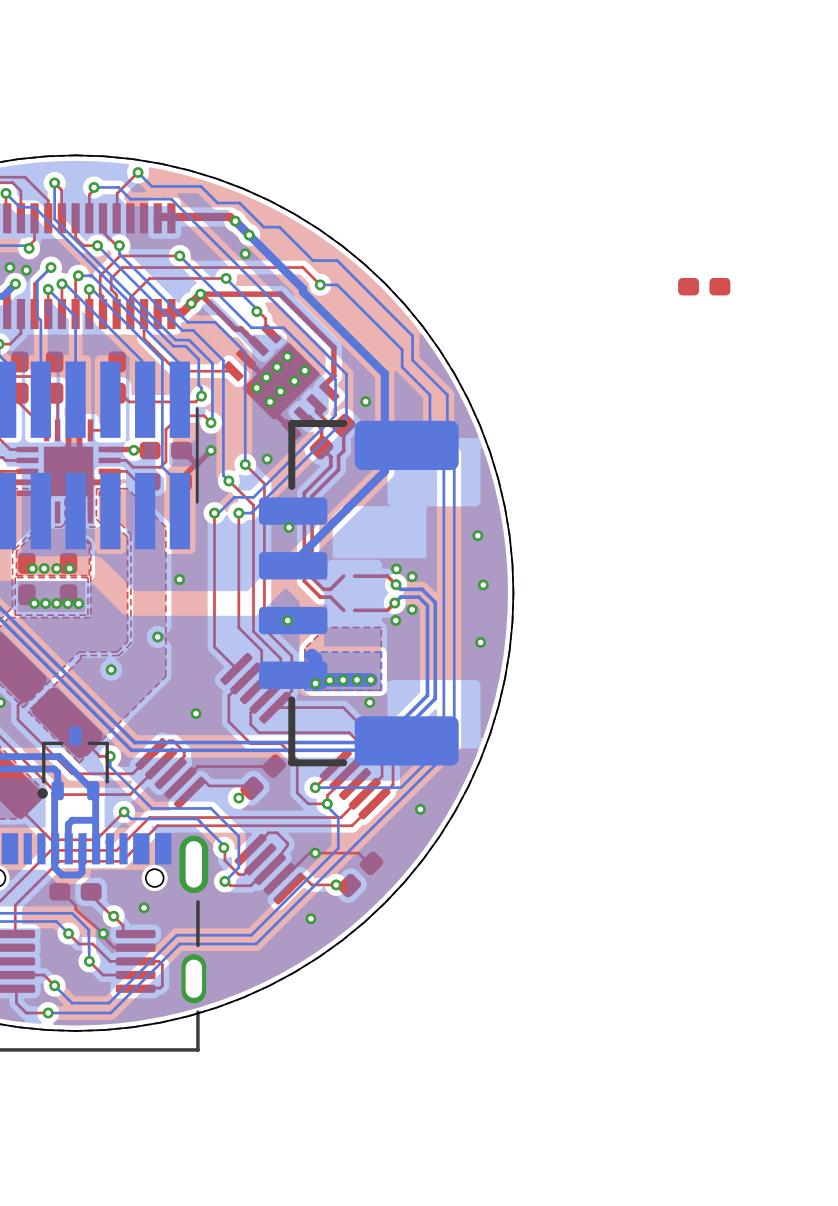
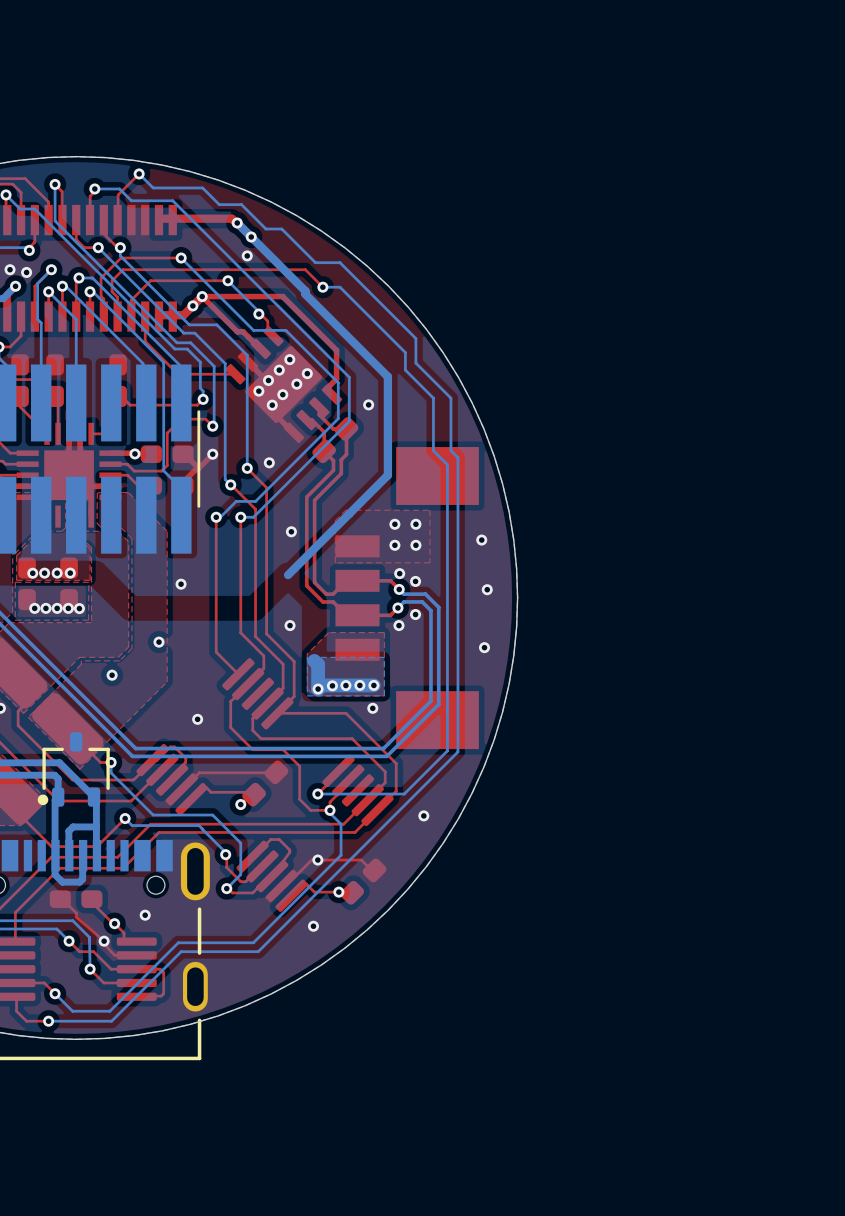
part: (704, 286) -> none
top zone outline: none -> (429, 510) (345, 510) (335, 520) (335, 562) (429, 562) (429, 510)
via: none -> (394, 524)
via: none -> (415, 524)
via: none -> (394, 545)
via: none -> (415, 545)
part: (358, 593) -> none
part: none -> (407, 598)

